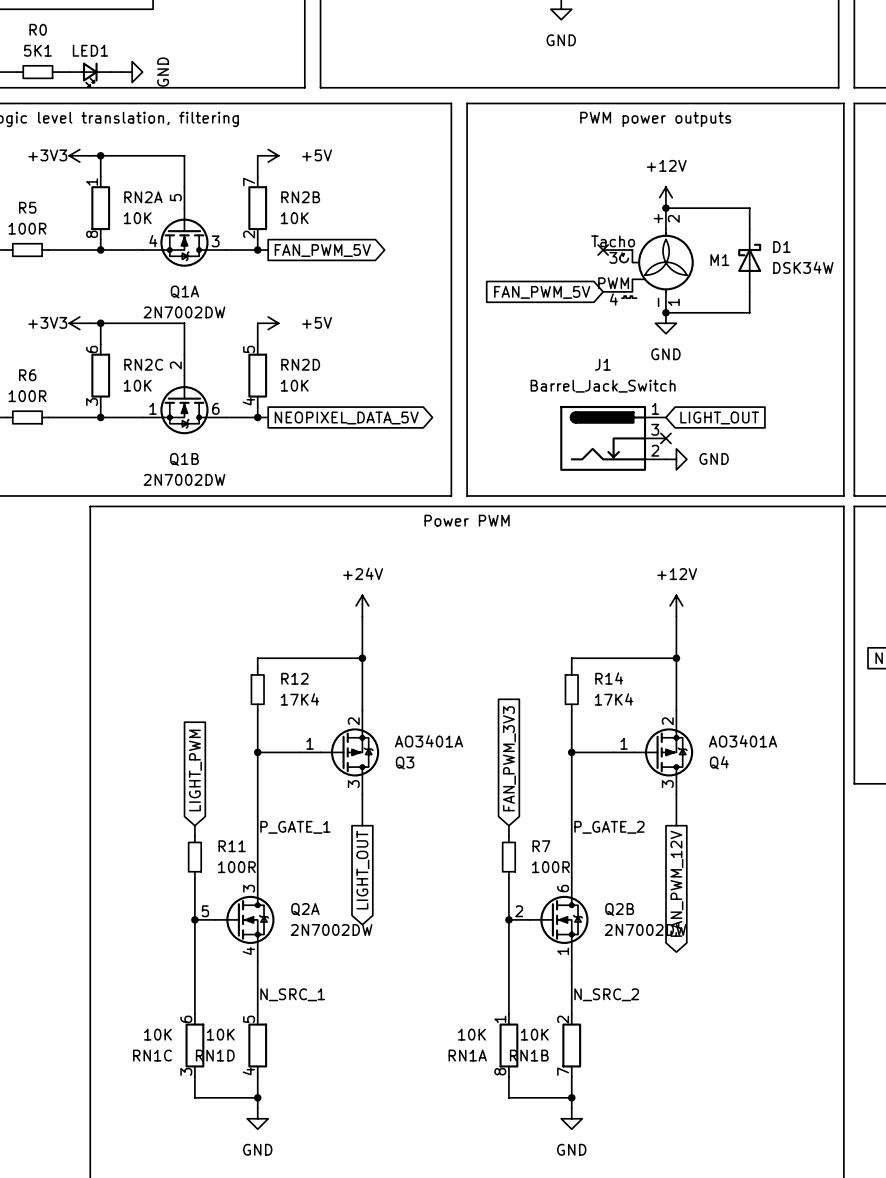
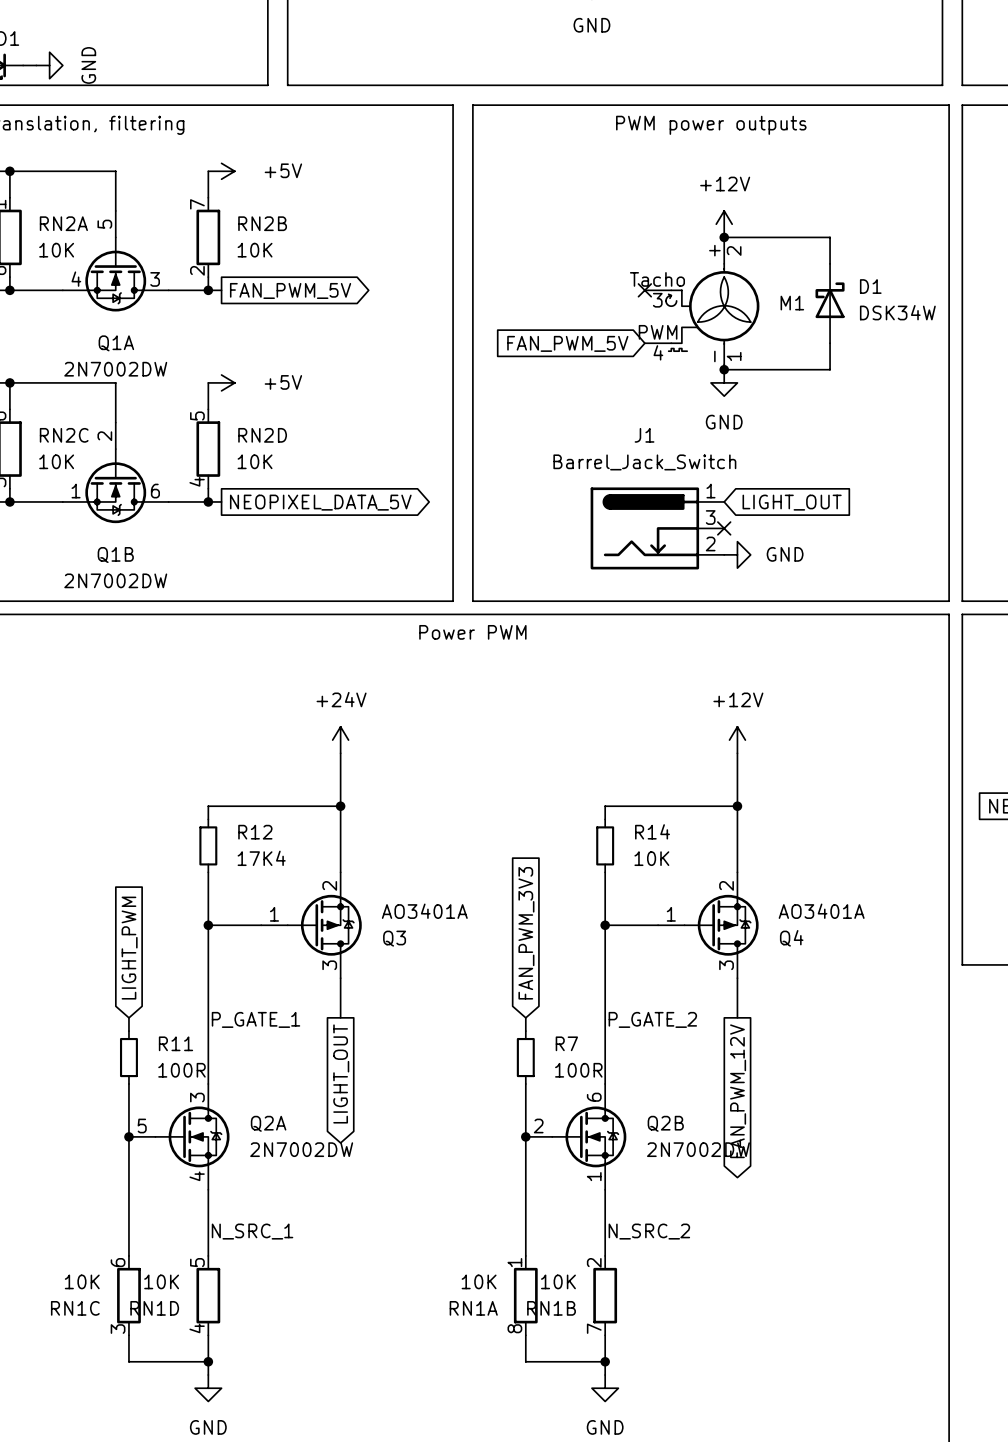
R14 value: 17K4 (613, 699) -> 10K (651, 858)

